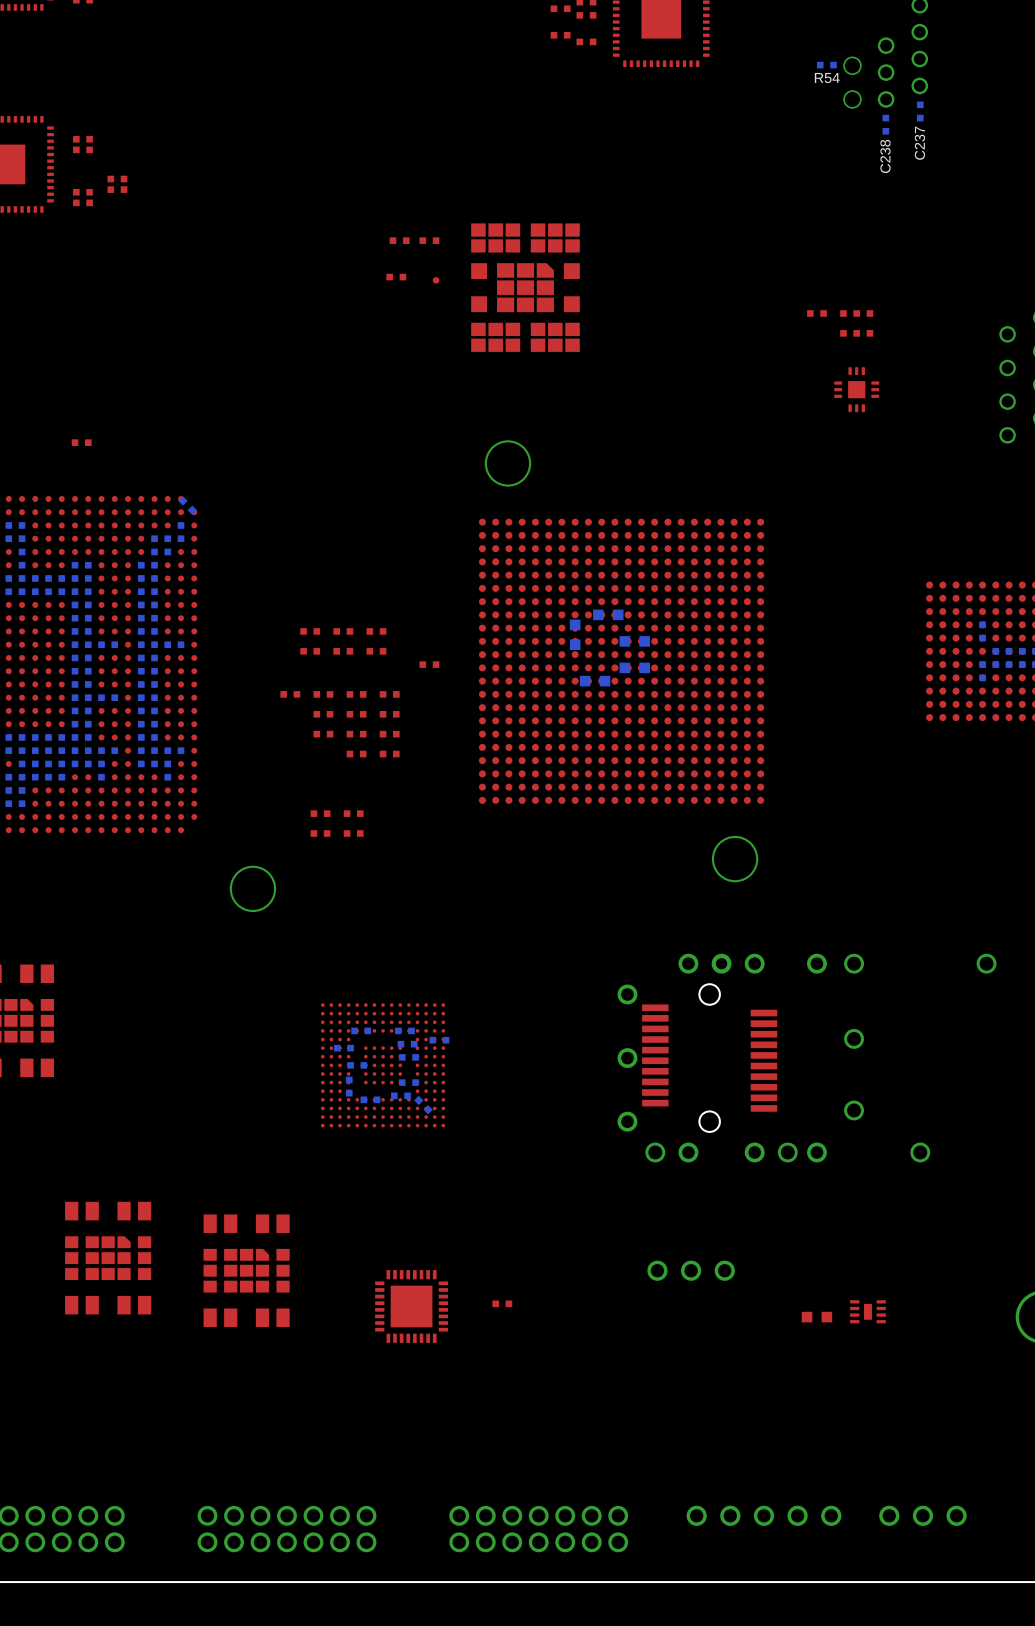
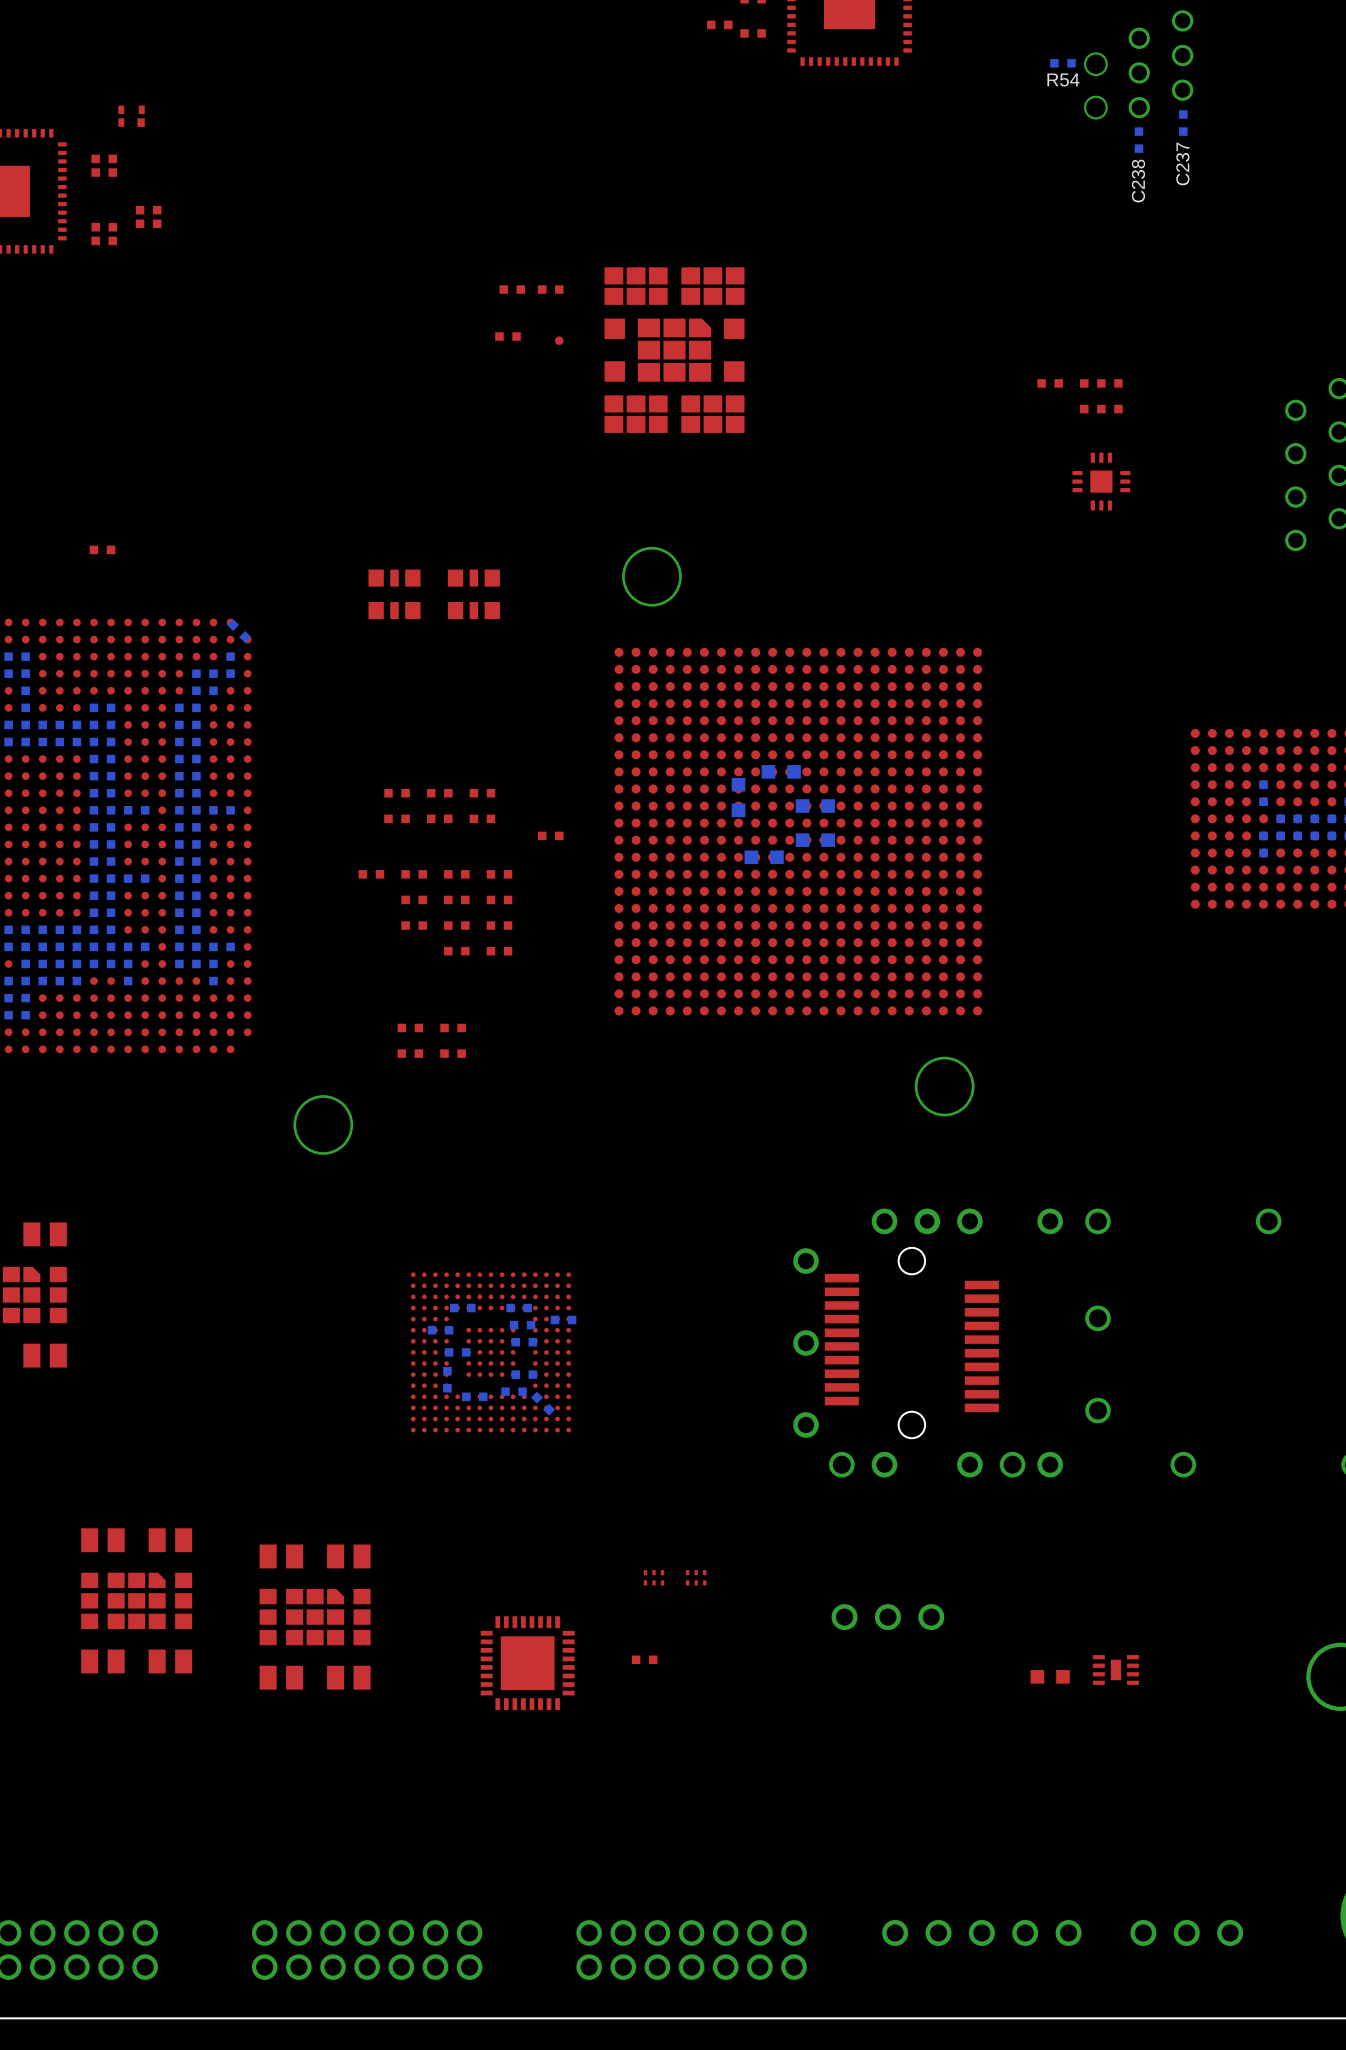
part: none -> (131, 116)
part: none -> (394, 594)
part: none -> (473, 594)
part: none -> (654, 1577)
part: none -> (696, 1577)

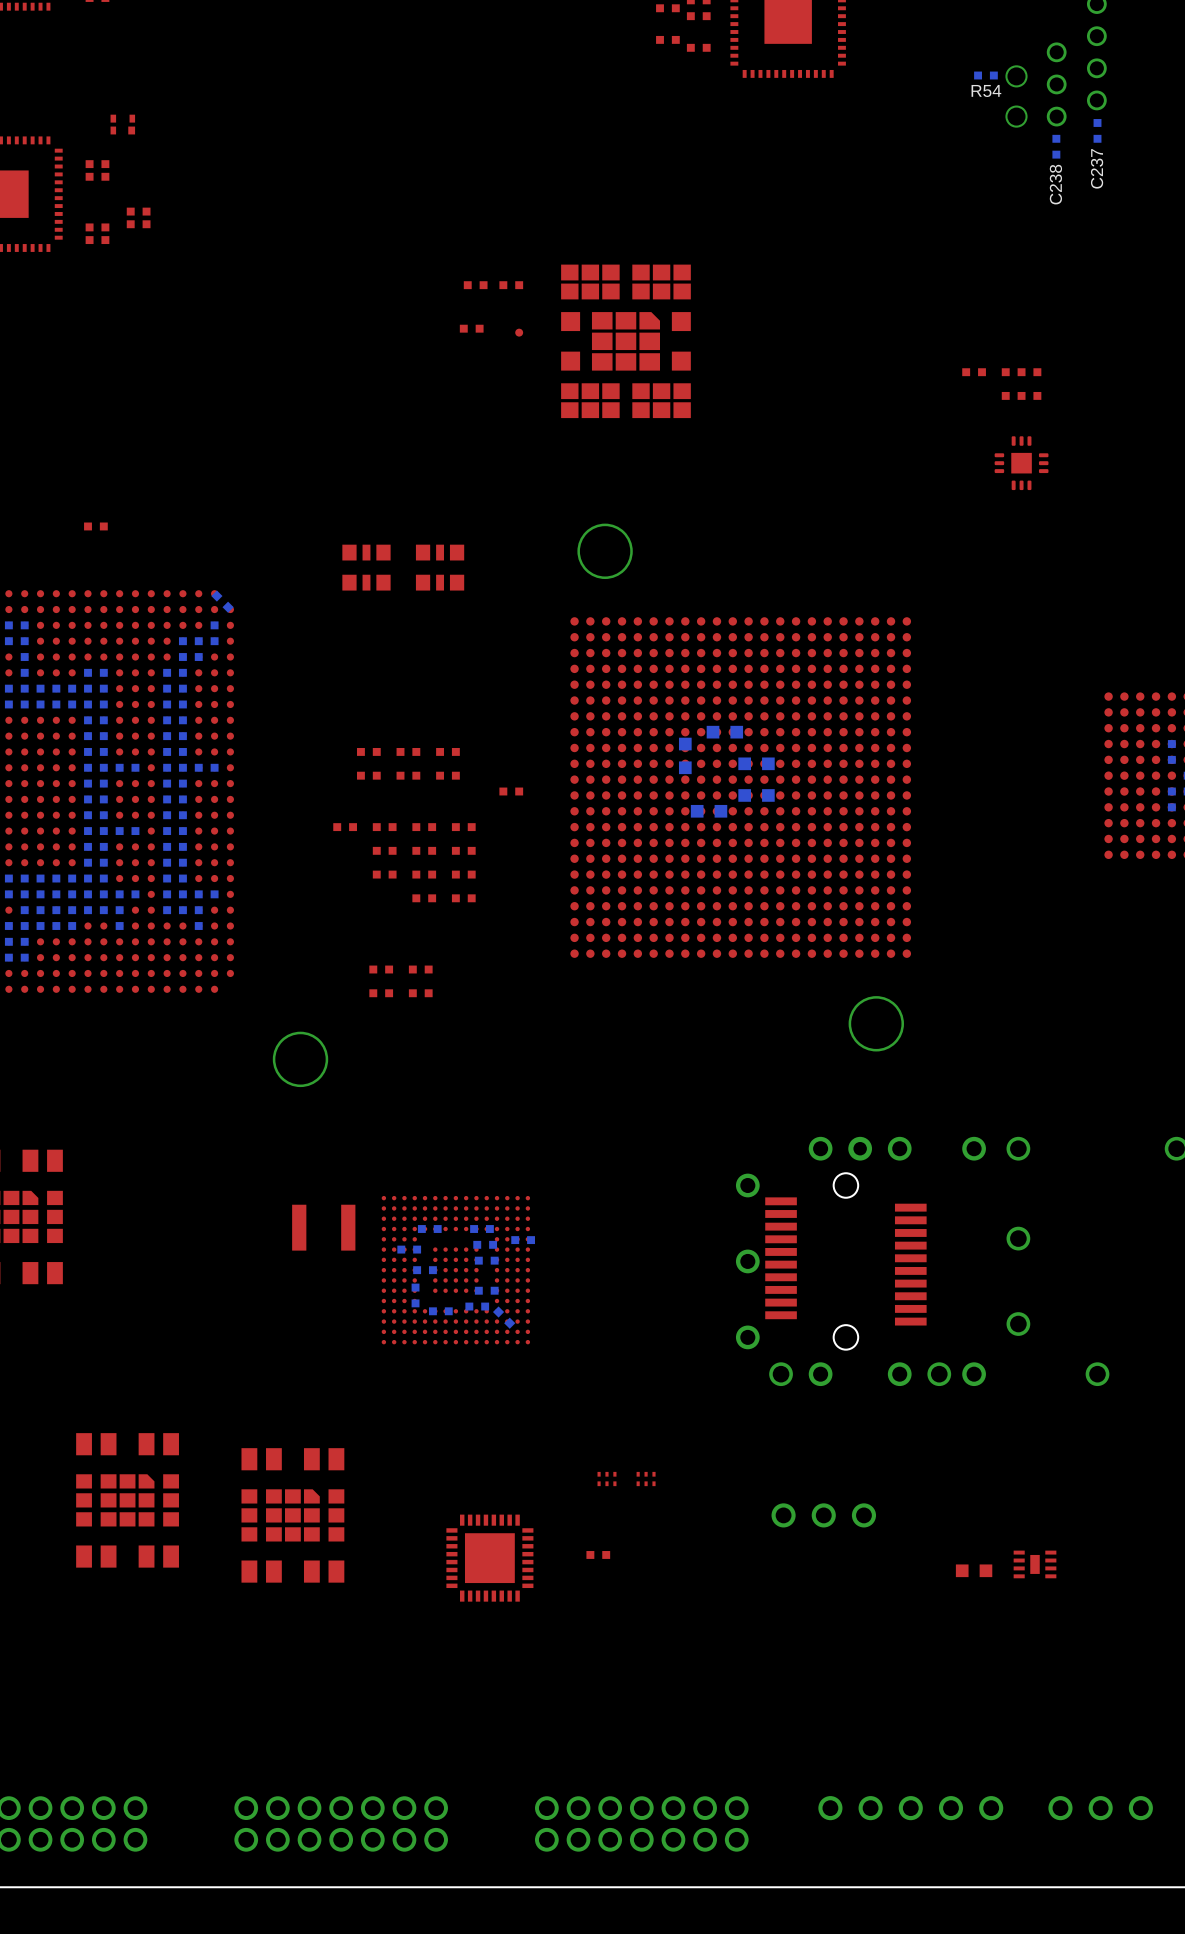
part: none -> (323, 1227)

